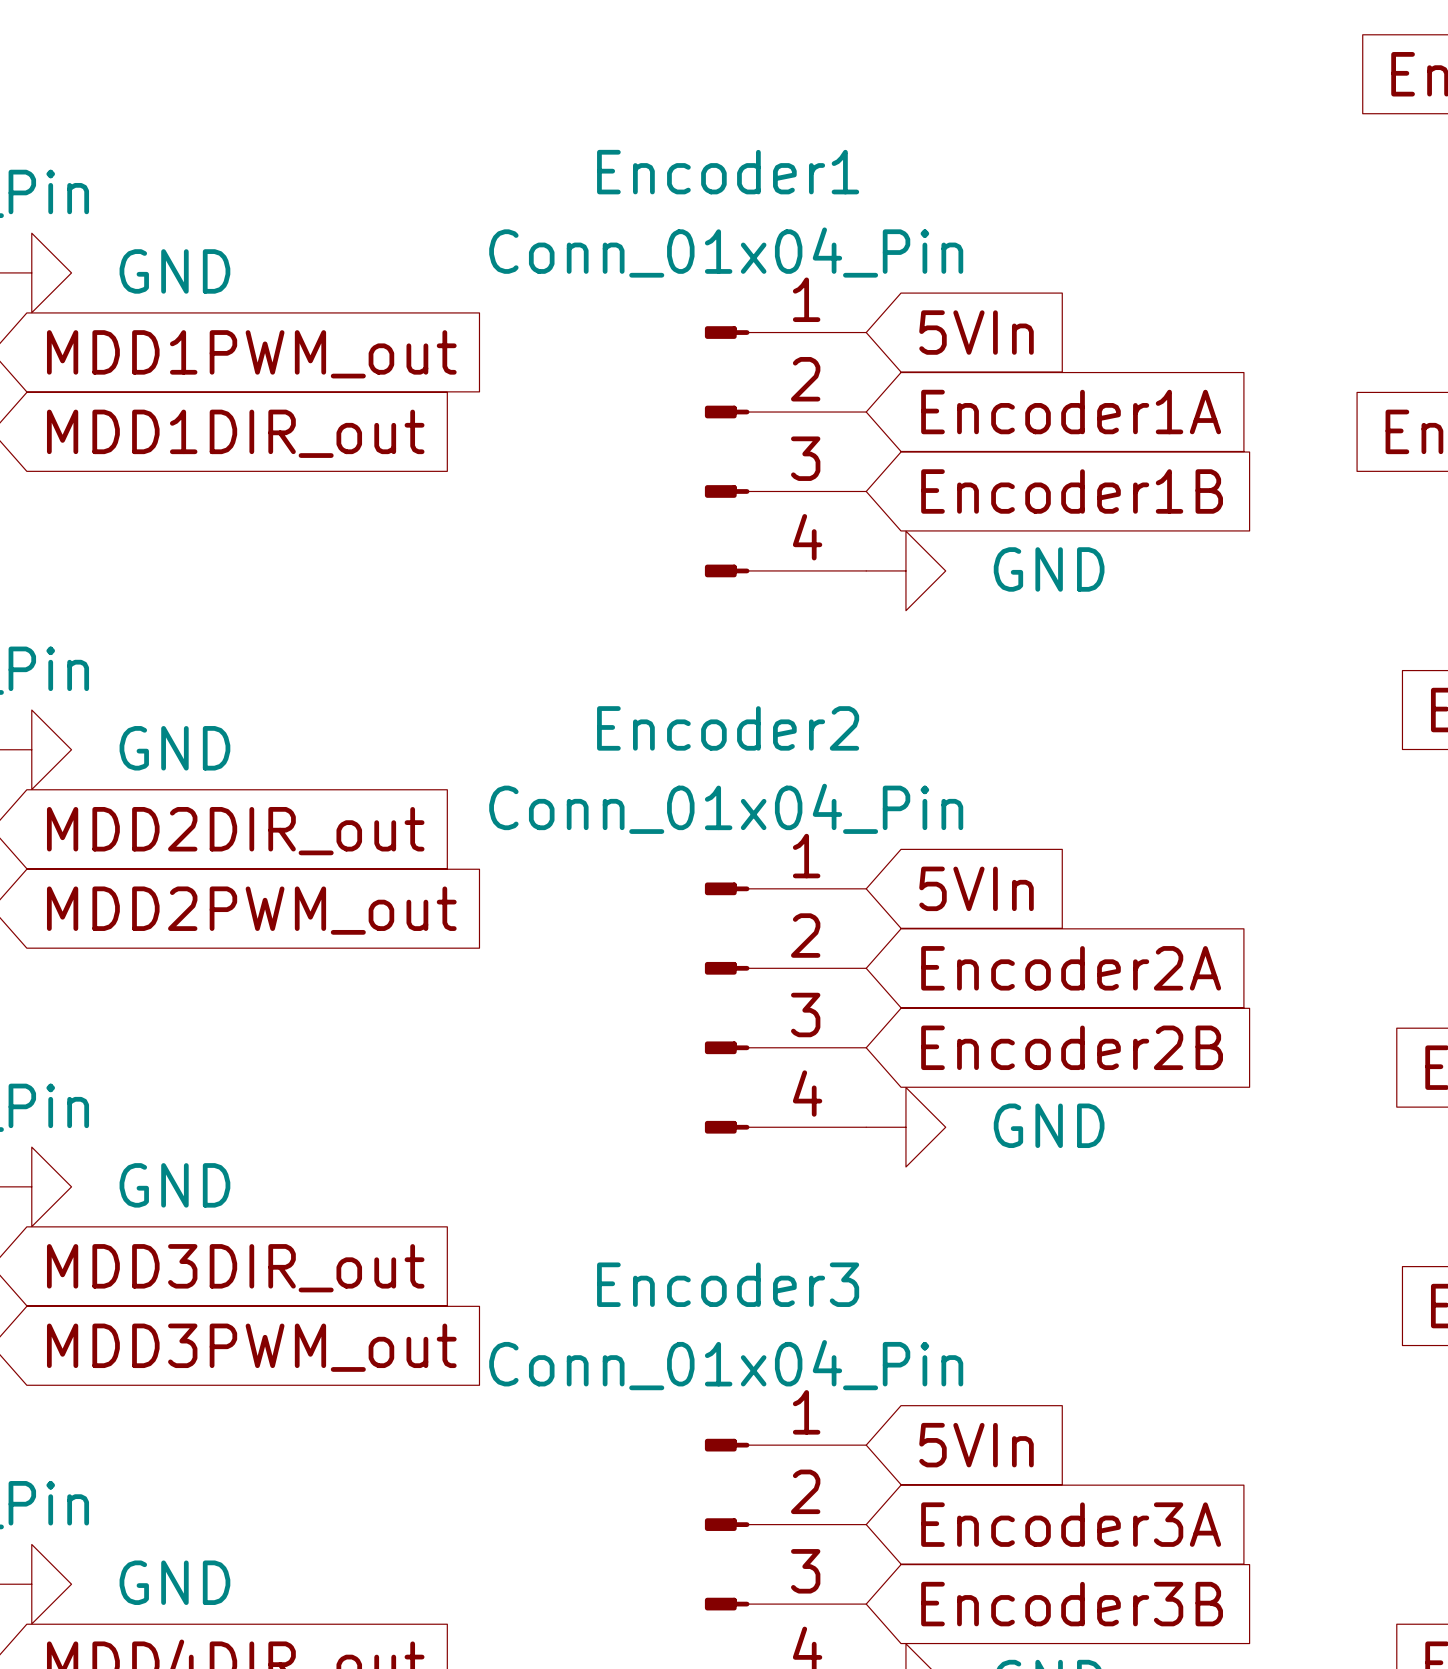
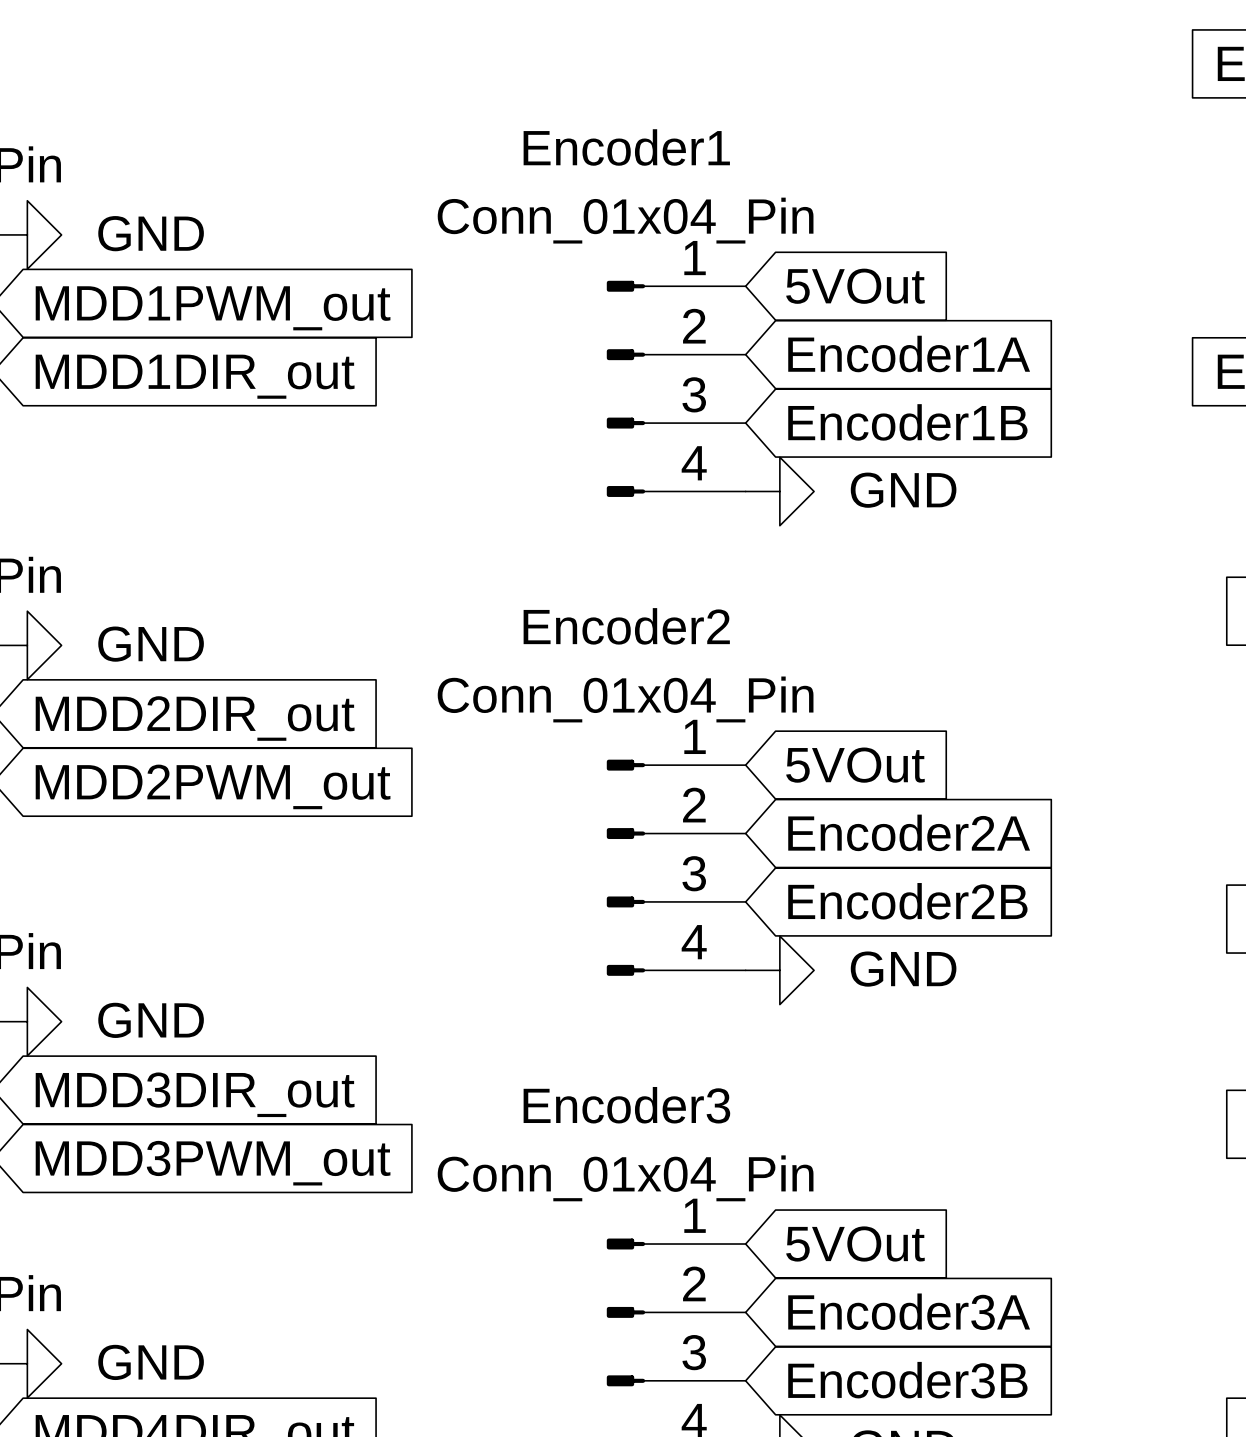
global label: 5VIn (976, 332) -> 5VOut (855, 286)
global label: 5VIn (976, 888) -> 5VOut (855, 765)
global label: 5VIn (976, 1445) -> 5VOut (855, 1243)

